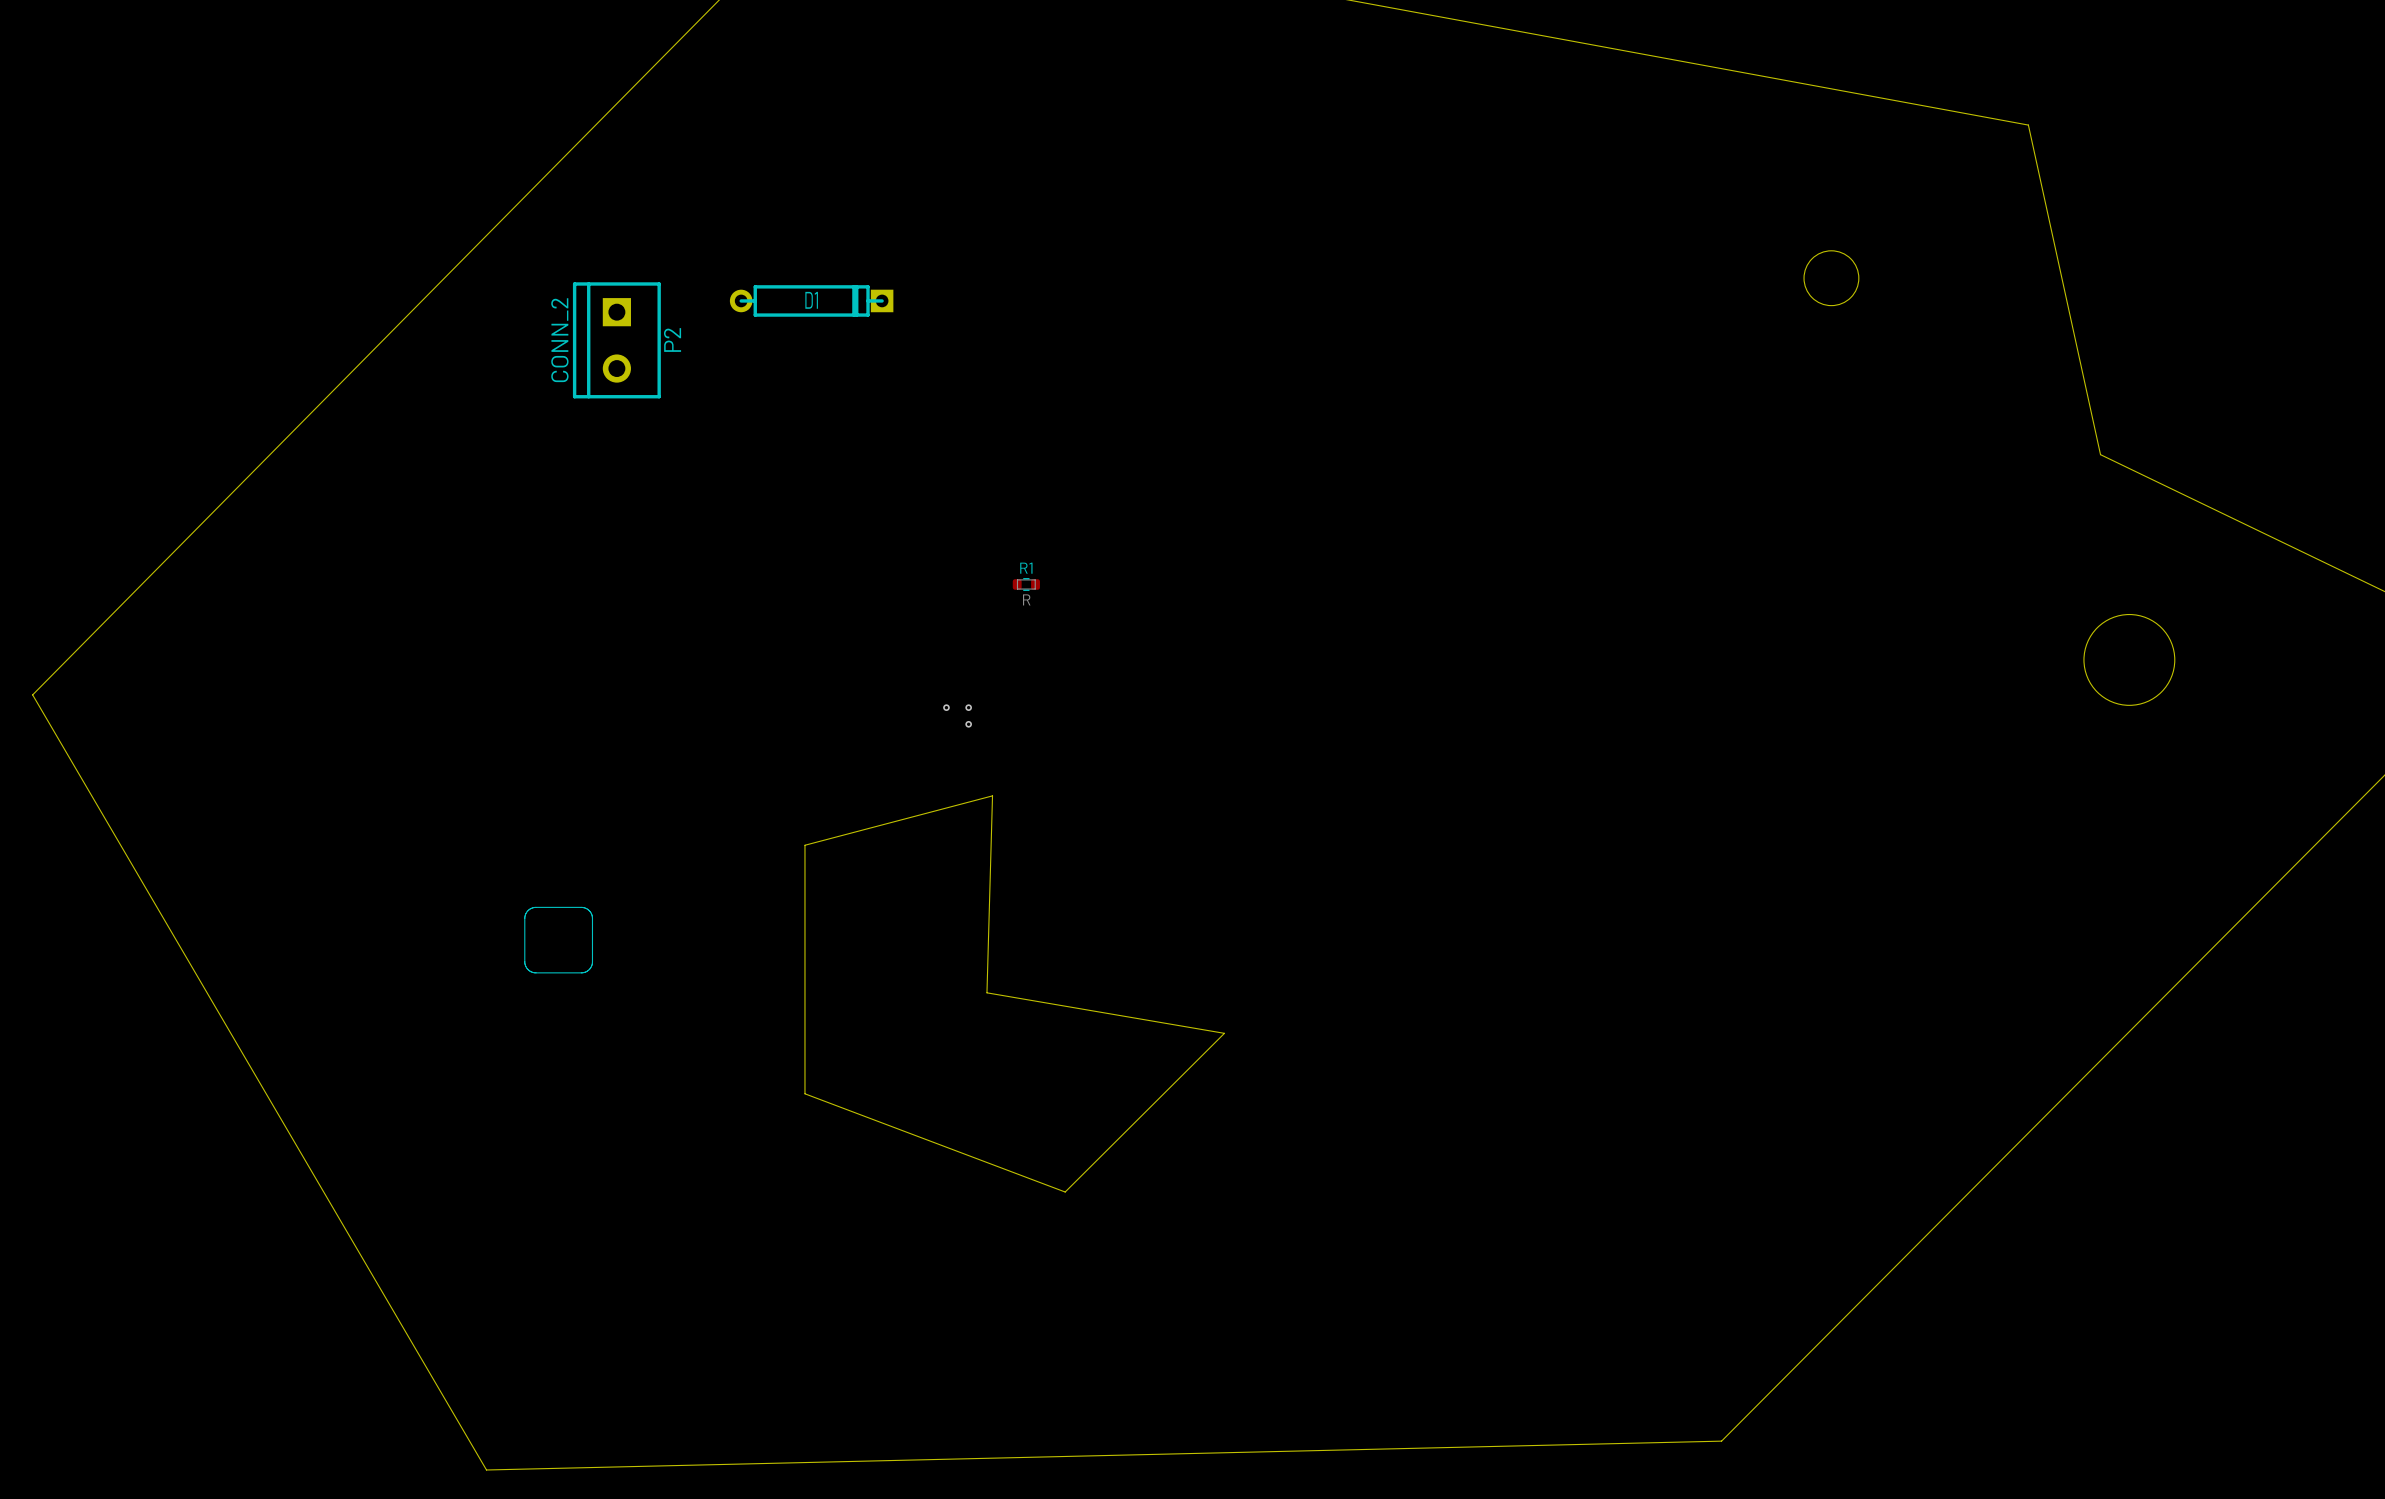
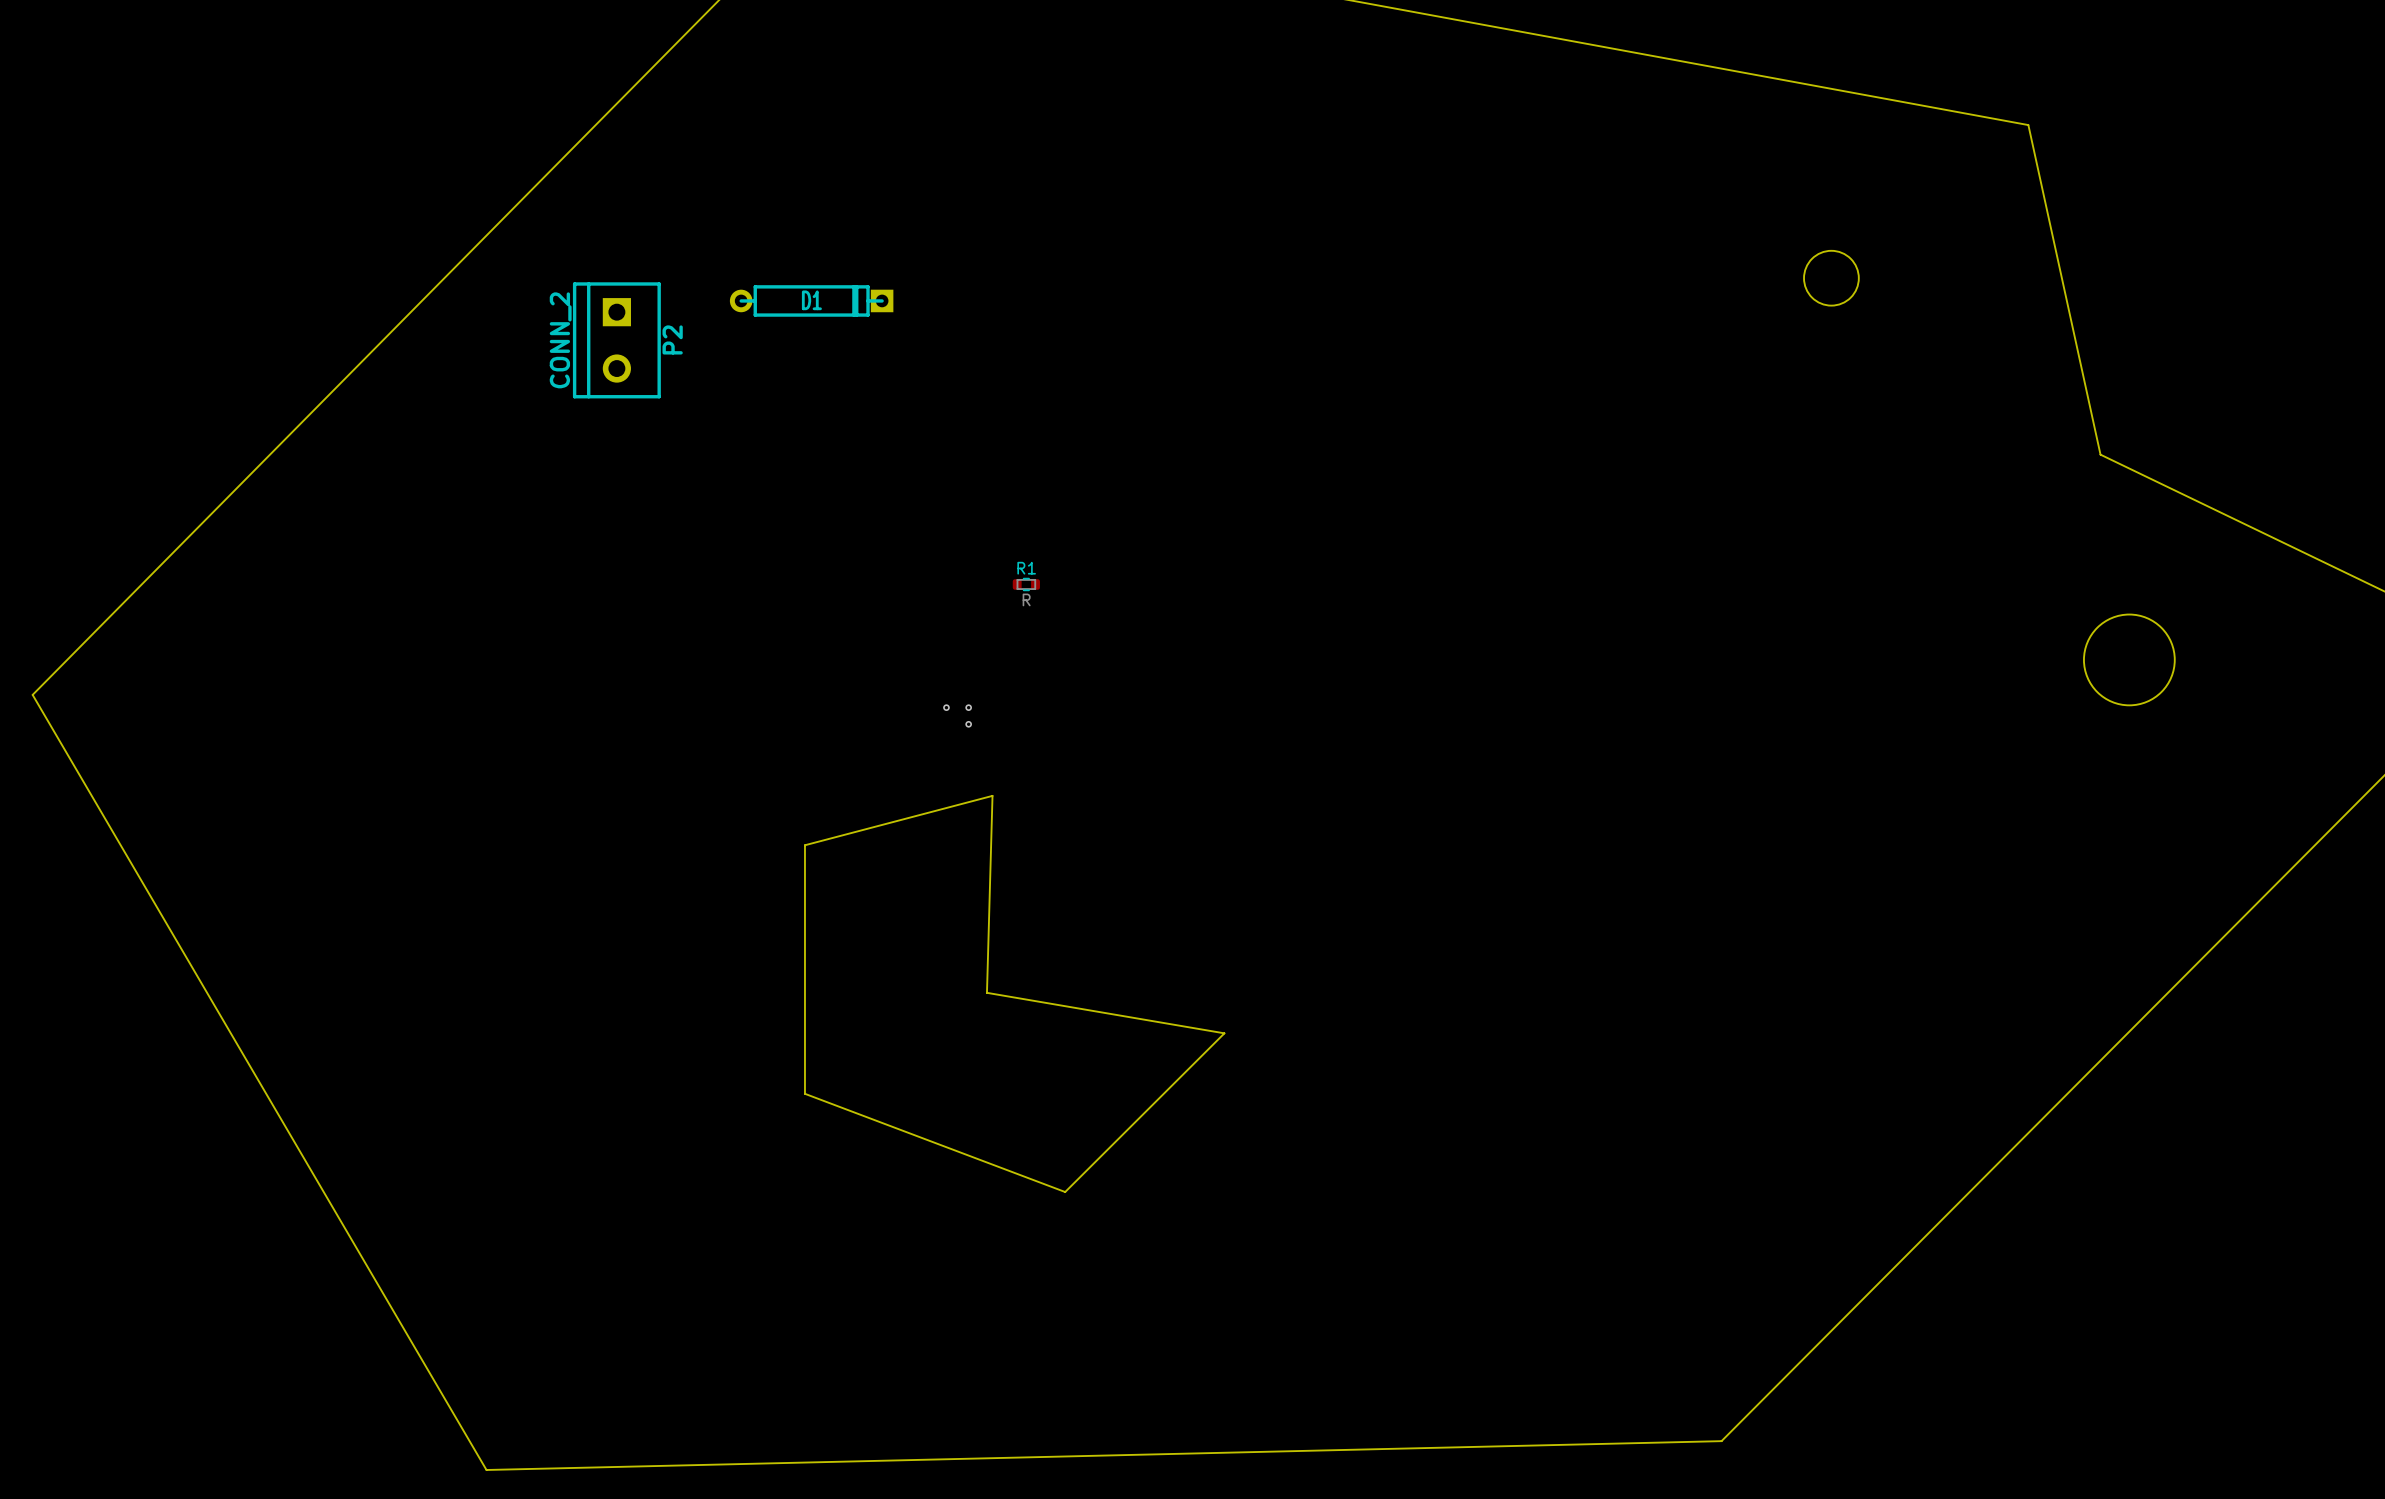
line: (535, 907) (582, 907) (590, 911) (592, 918) (592, 961) (588, 970) (581, 972) (535, 972) (527, 968) (524, 961) (524, 917) (528, 910) (535, 907) -> none

